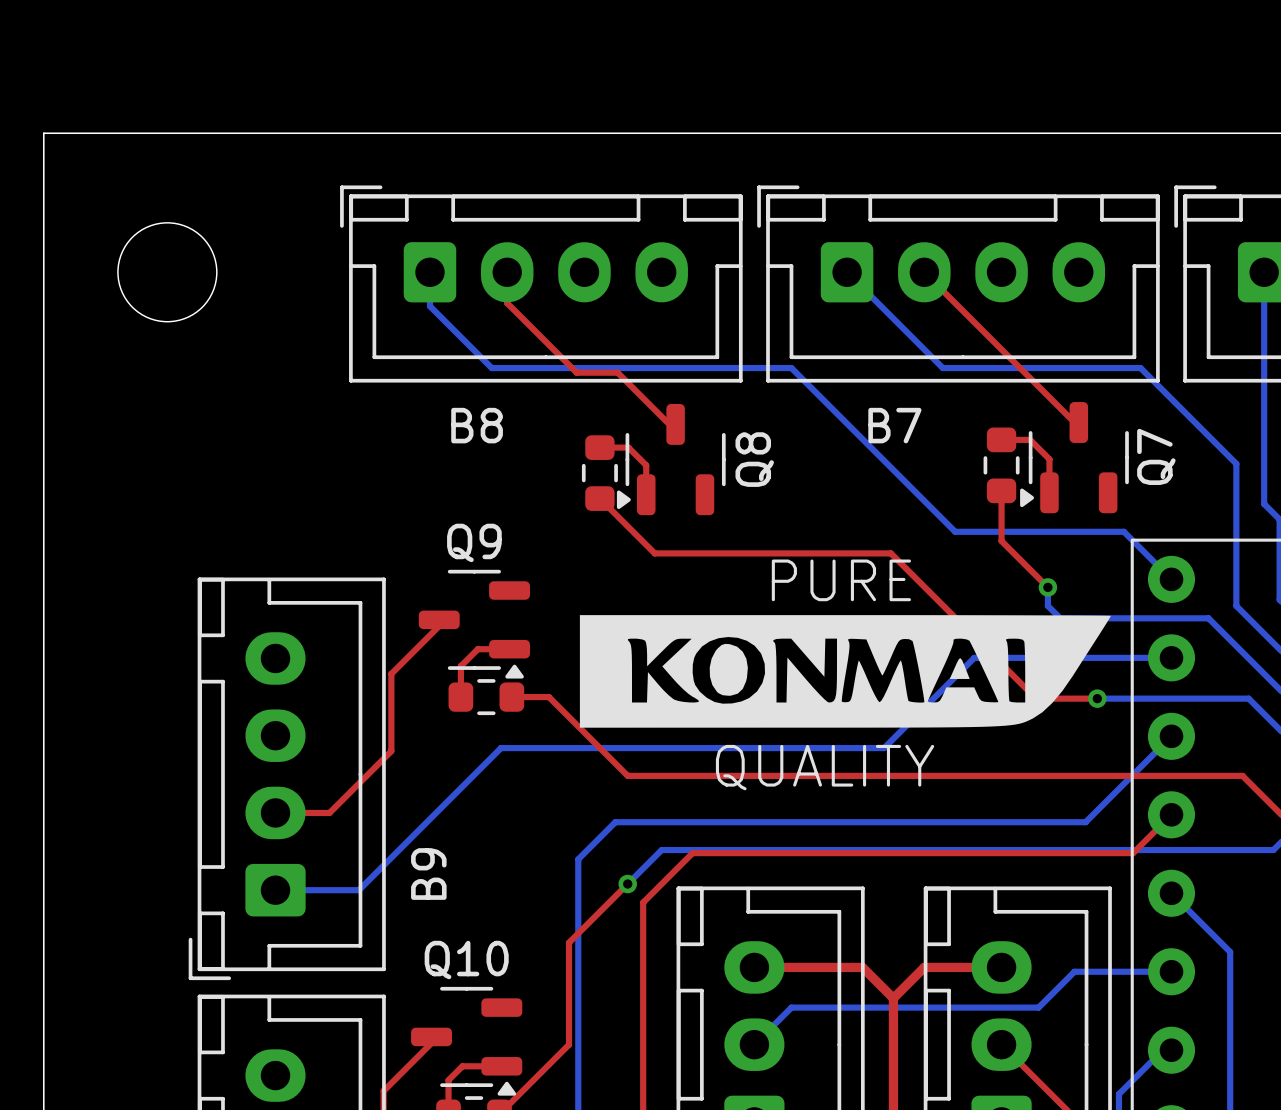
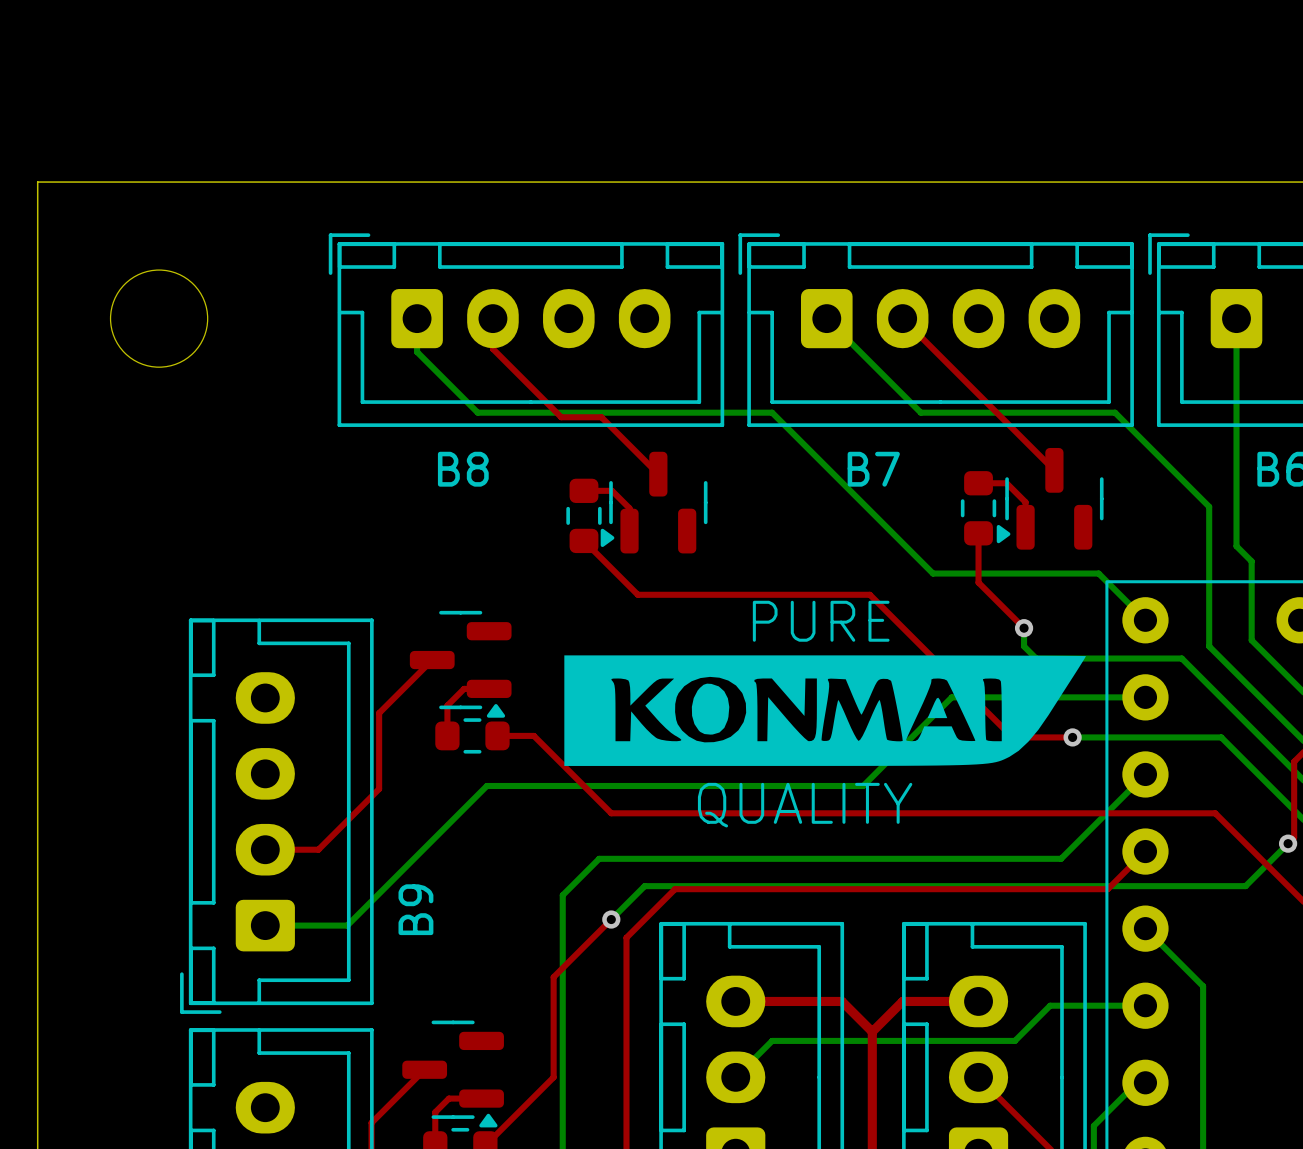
part: none -> (1050, 498)
Q7: (1074, 457) -> none
Q8: (671, 459) -> none
part: none -> (654, 502)
Q9: (474, 624) -> none
part: none -> (460, 664)
Q10: (466, 1041) -> none
part: none -> (453, 1074)

